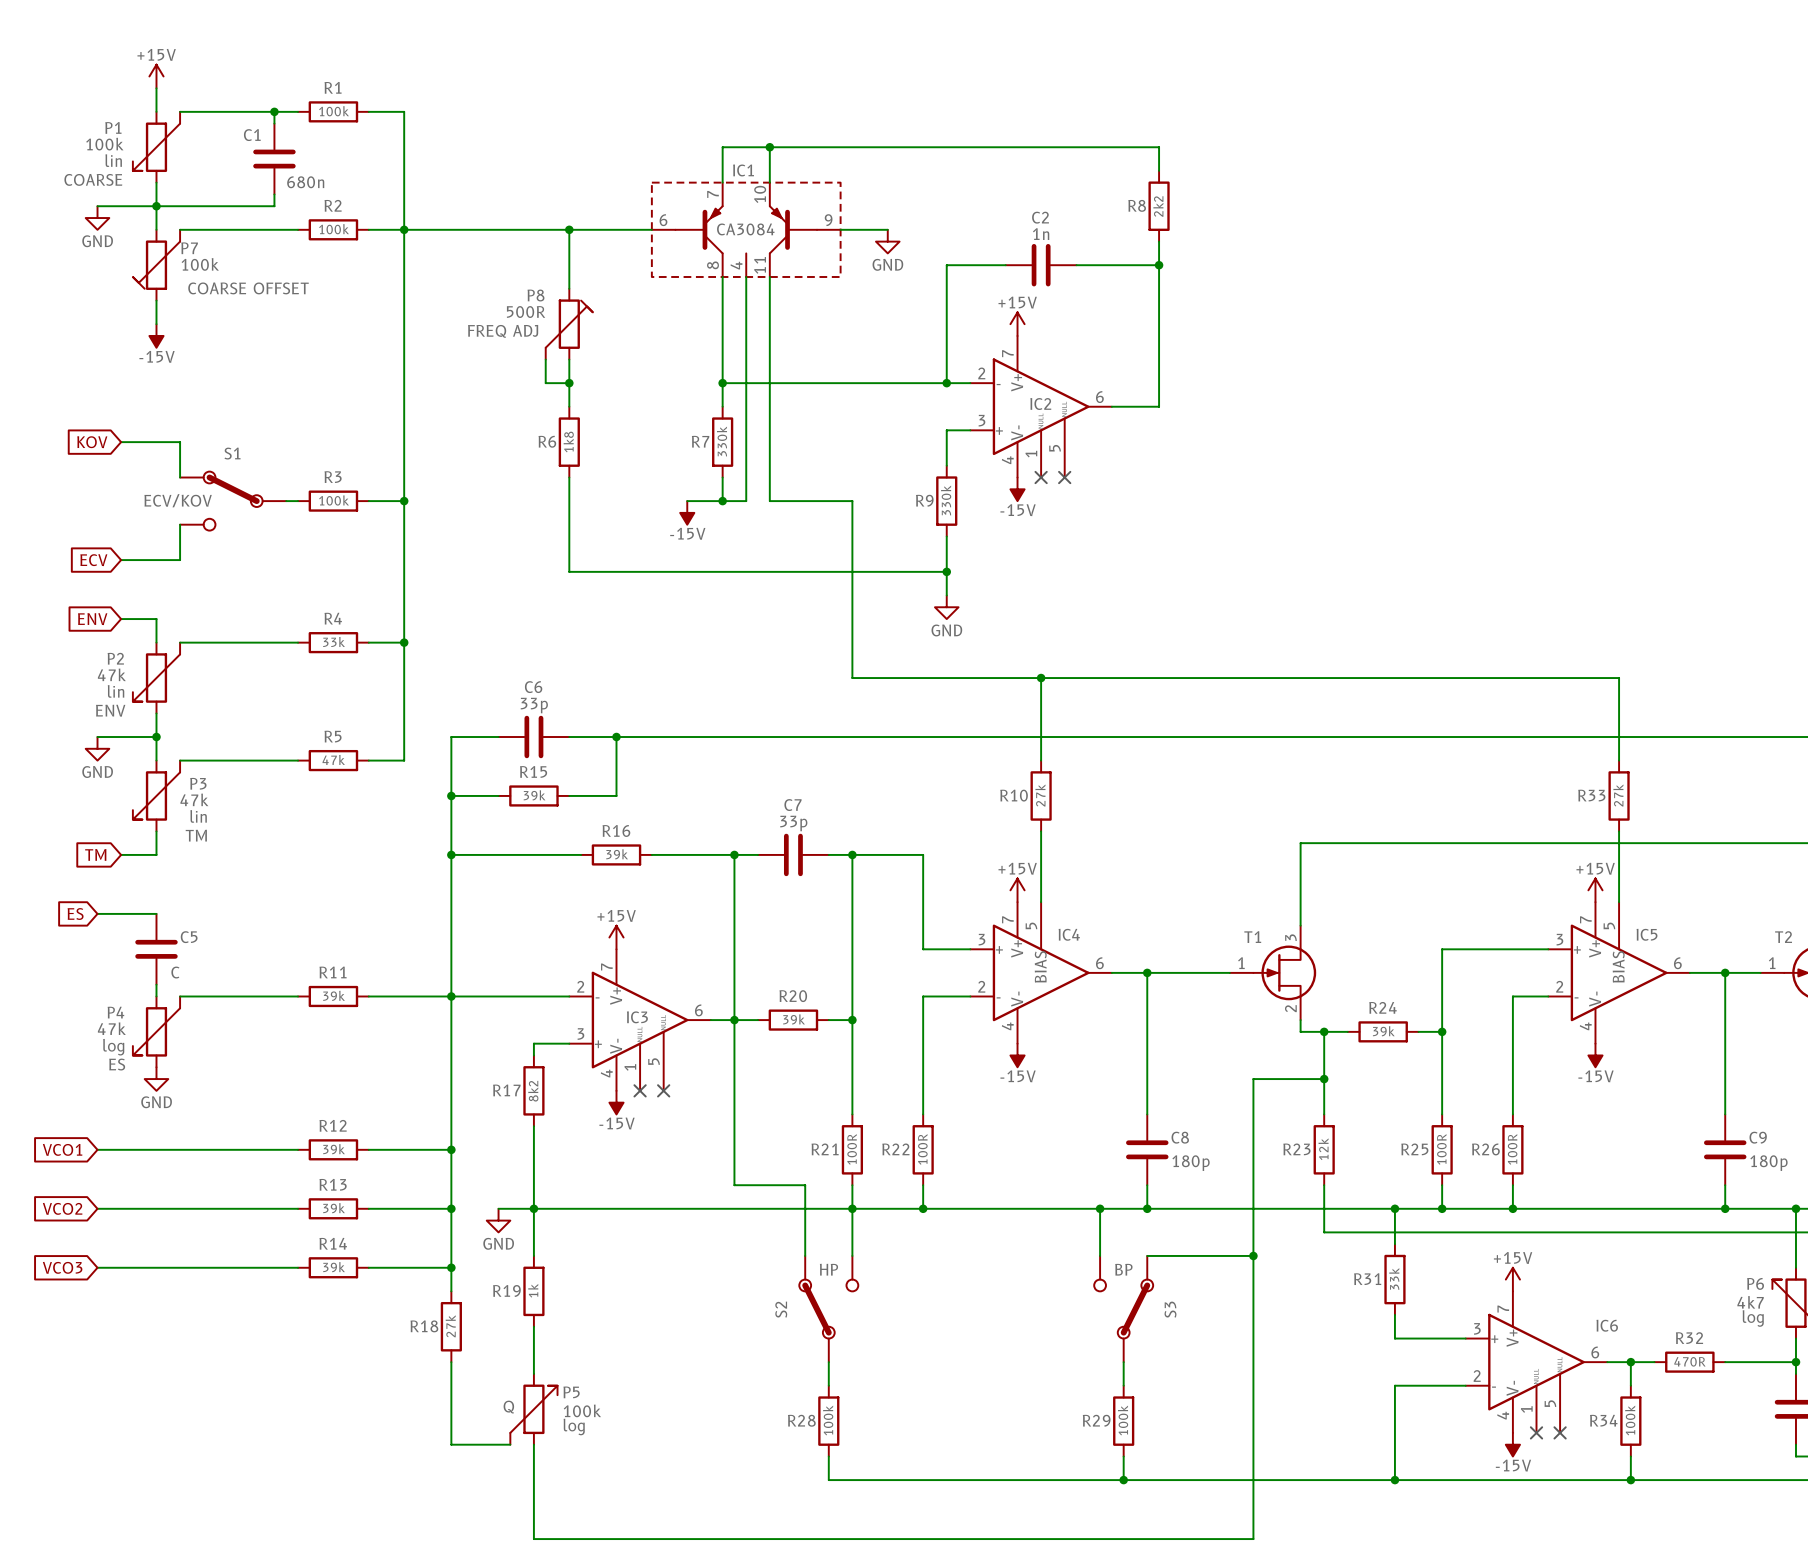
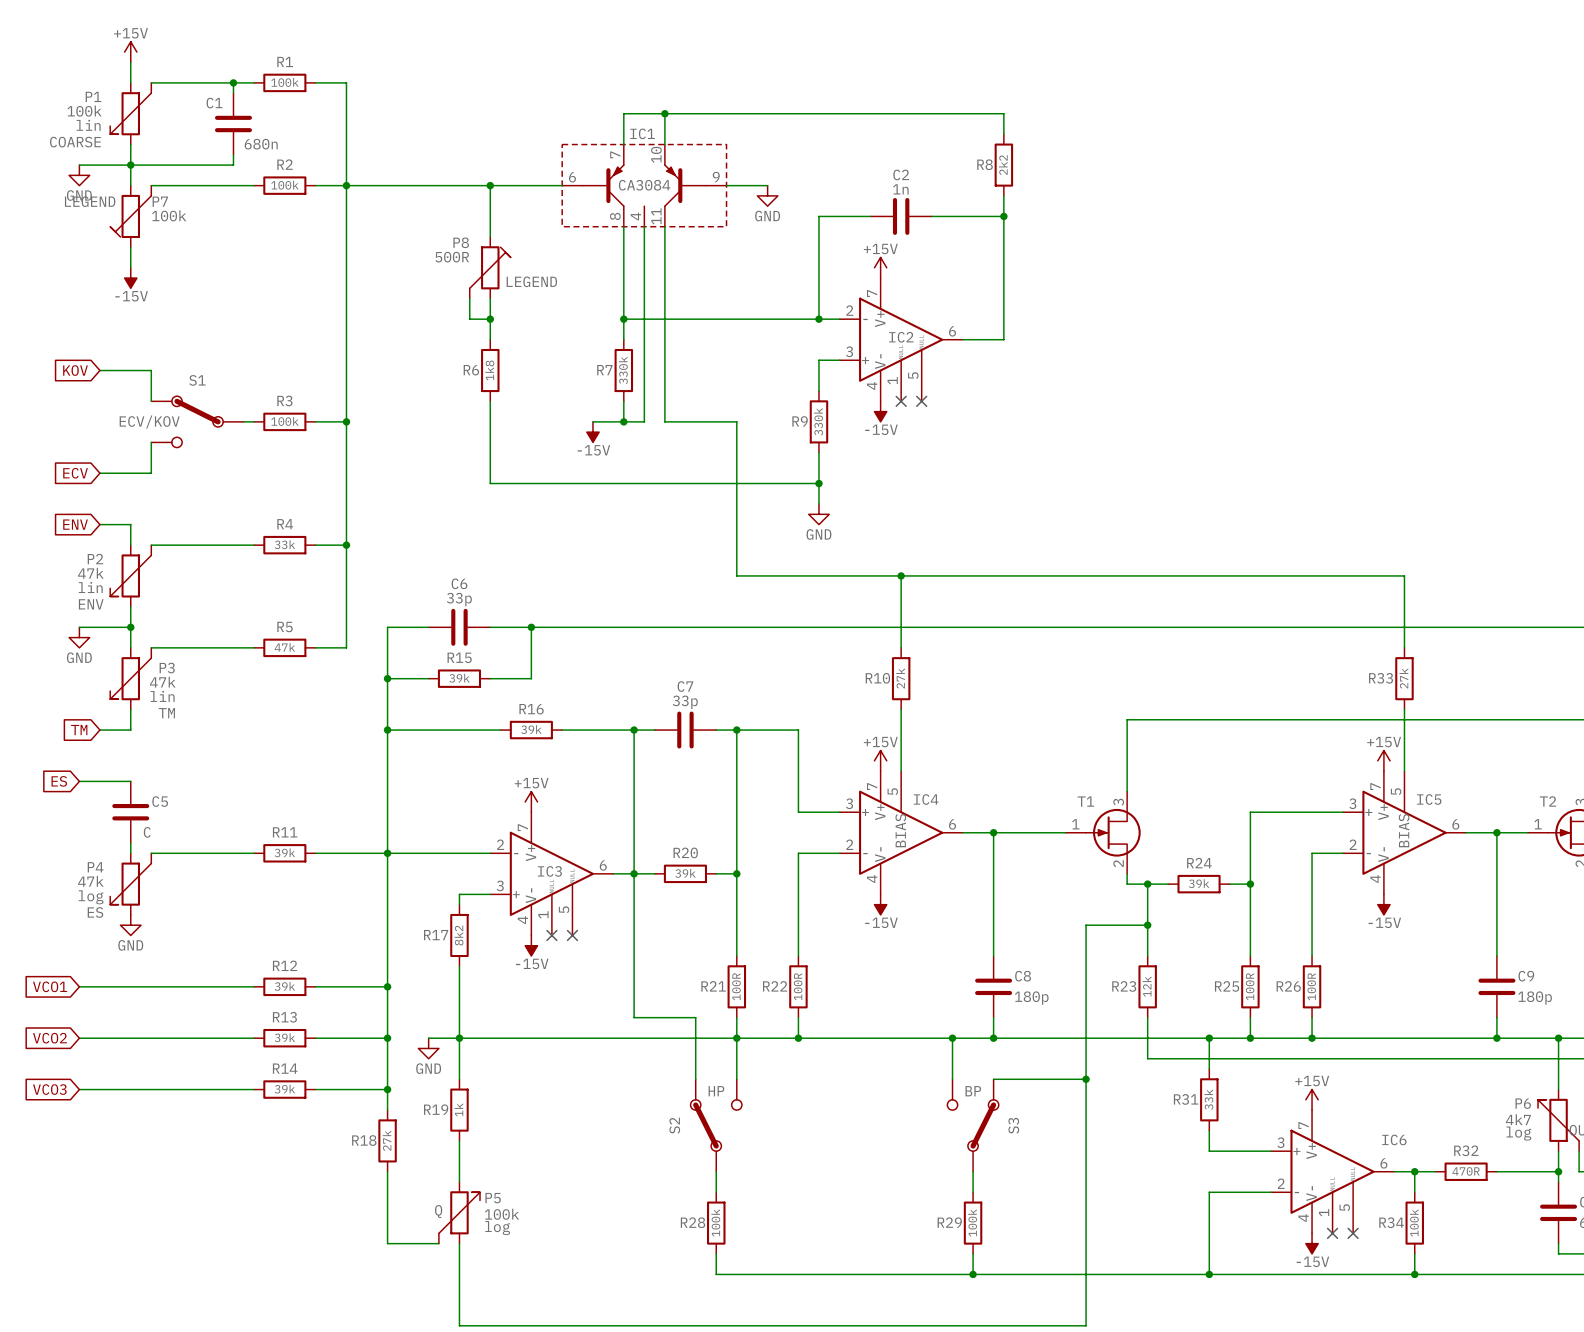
P7 text: COARSE OFFSET (248, 288) -> LEGEND (90, 201)
P8 text: FREQ ADJ (503, 331) -> LEGEND (531, 281)

